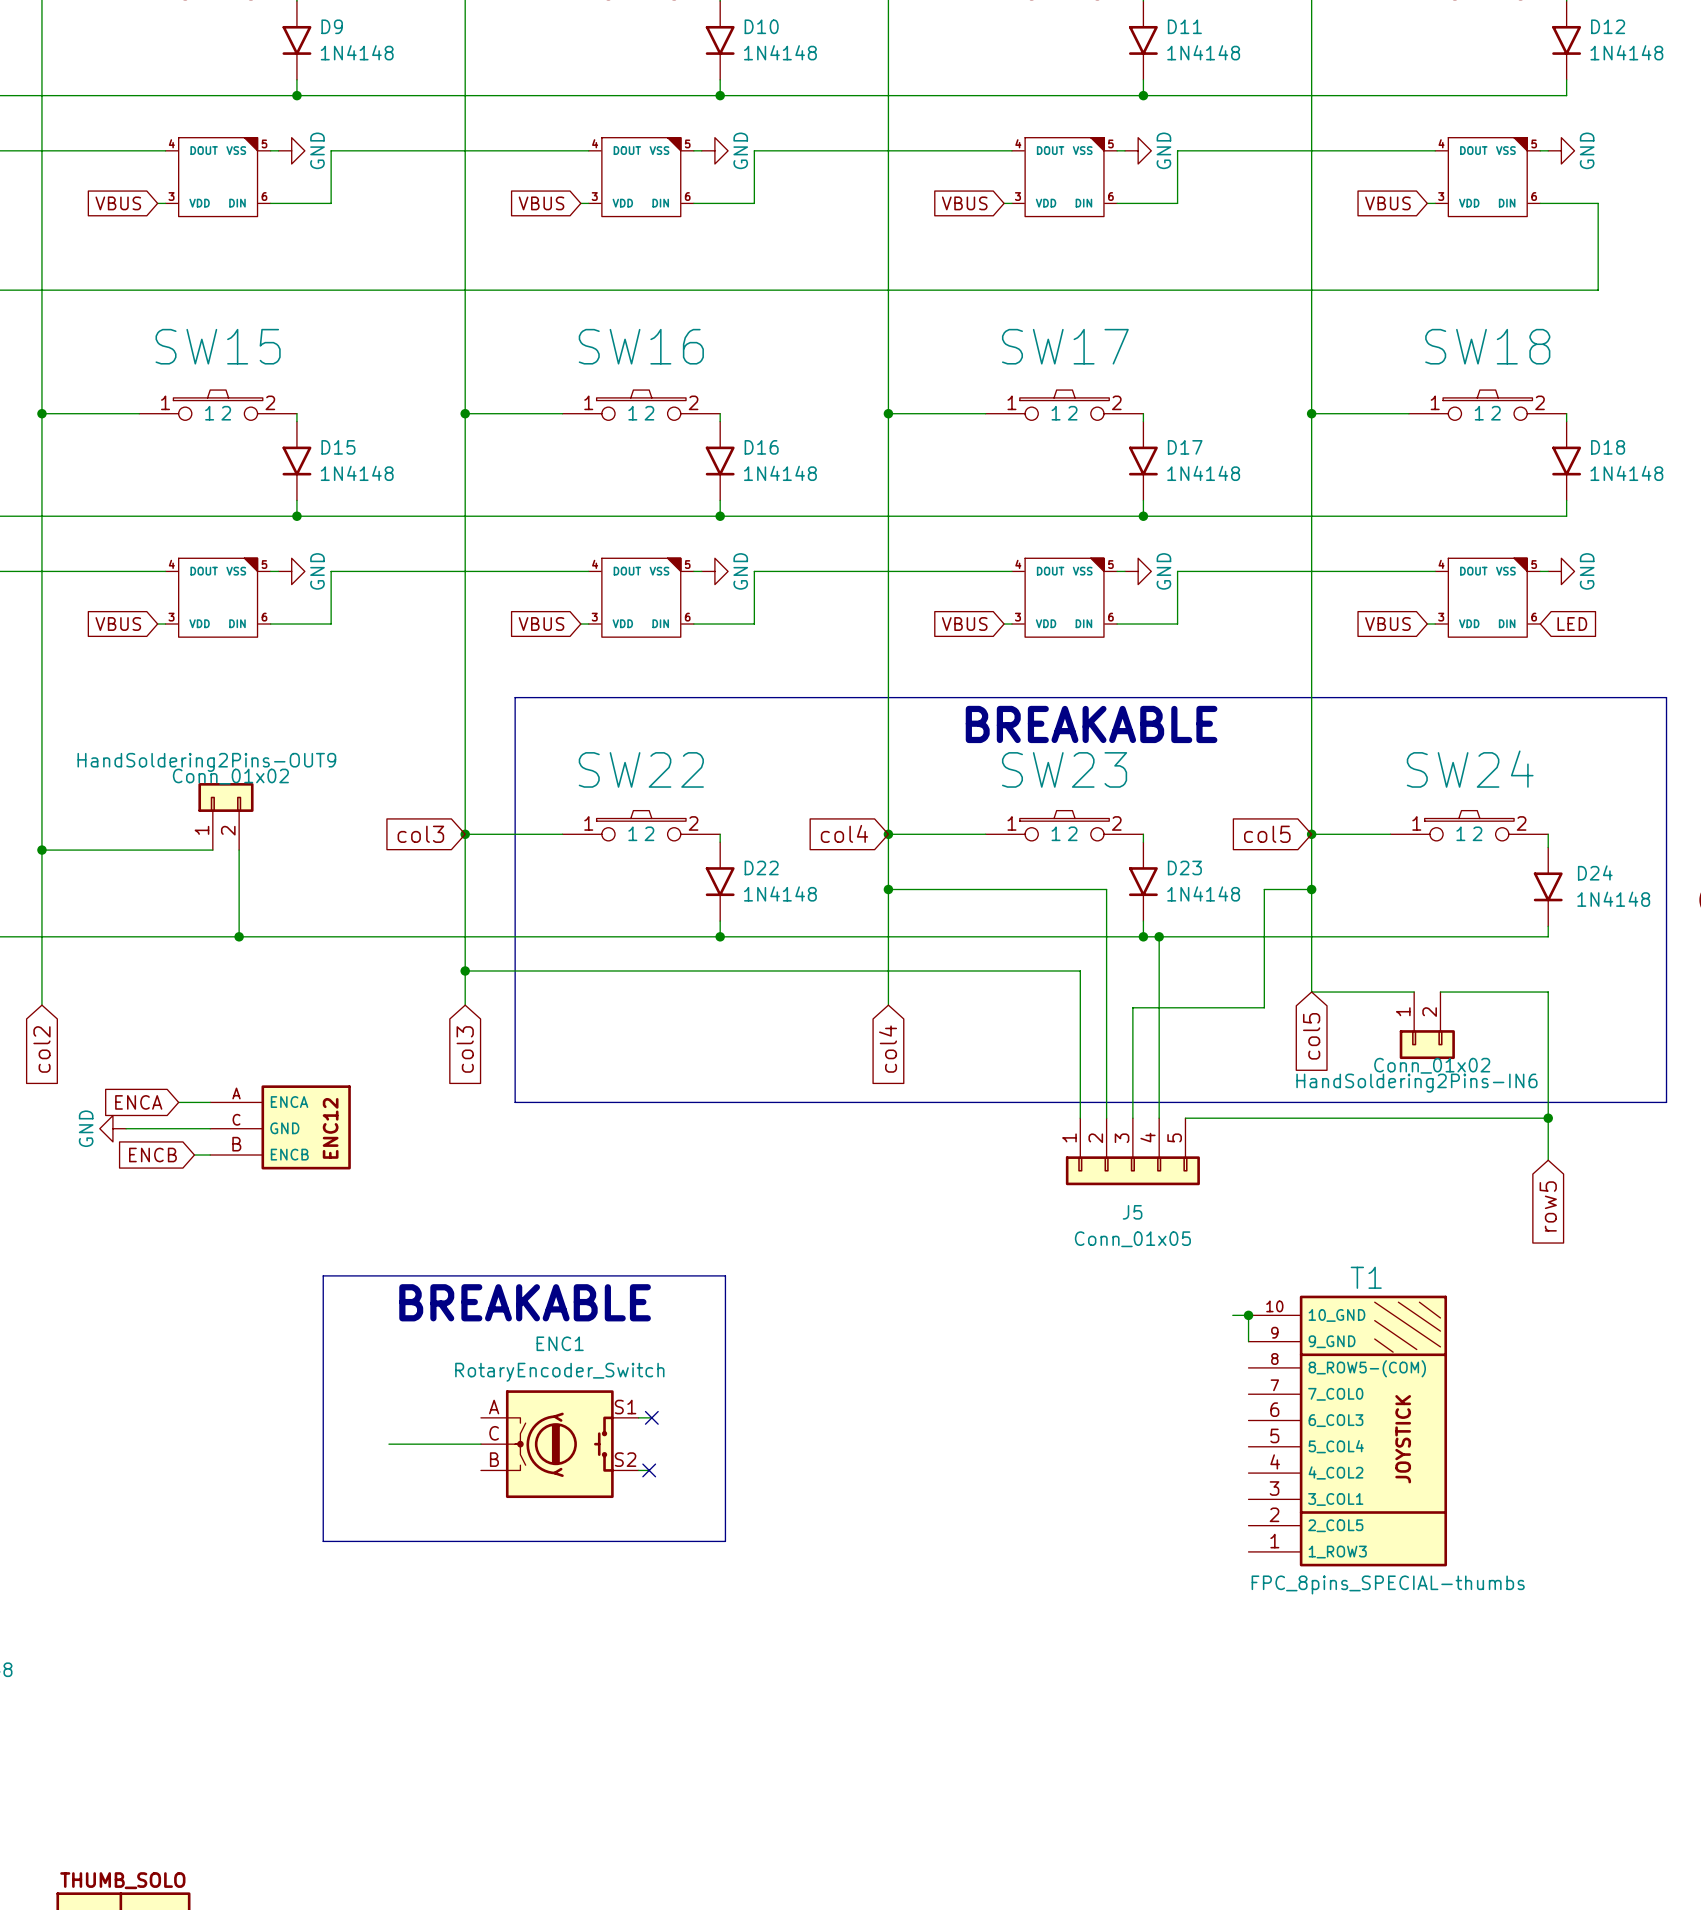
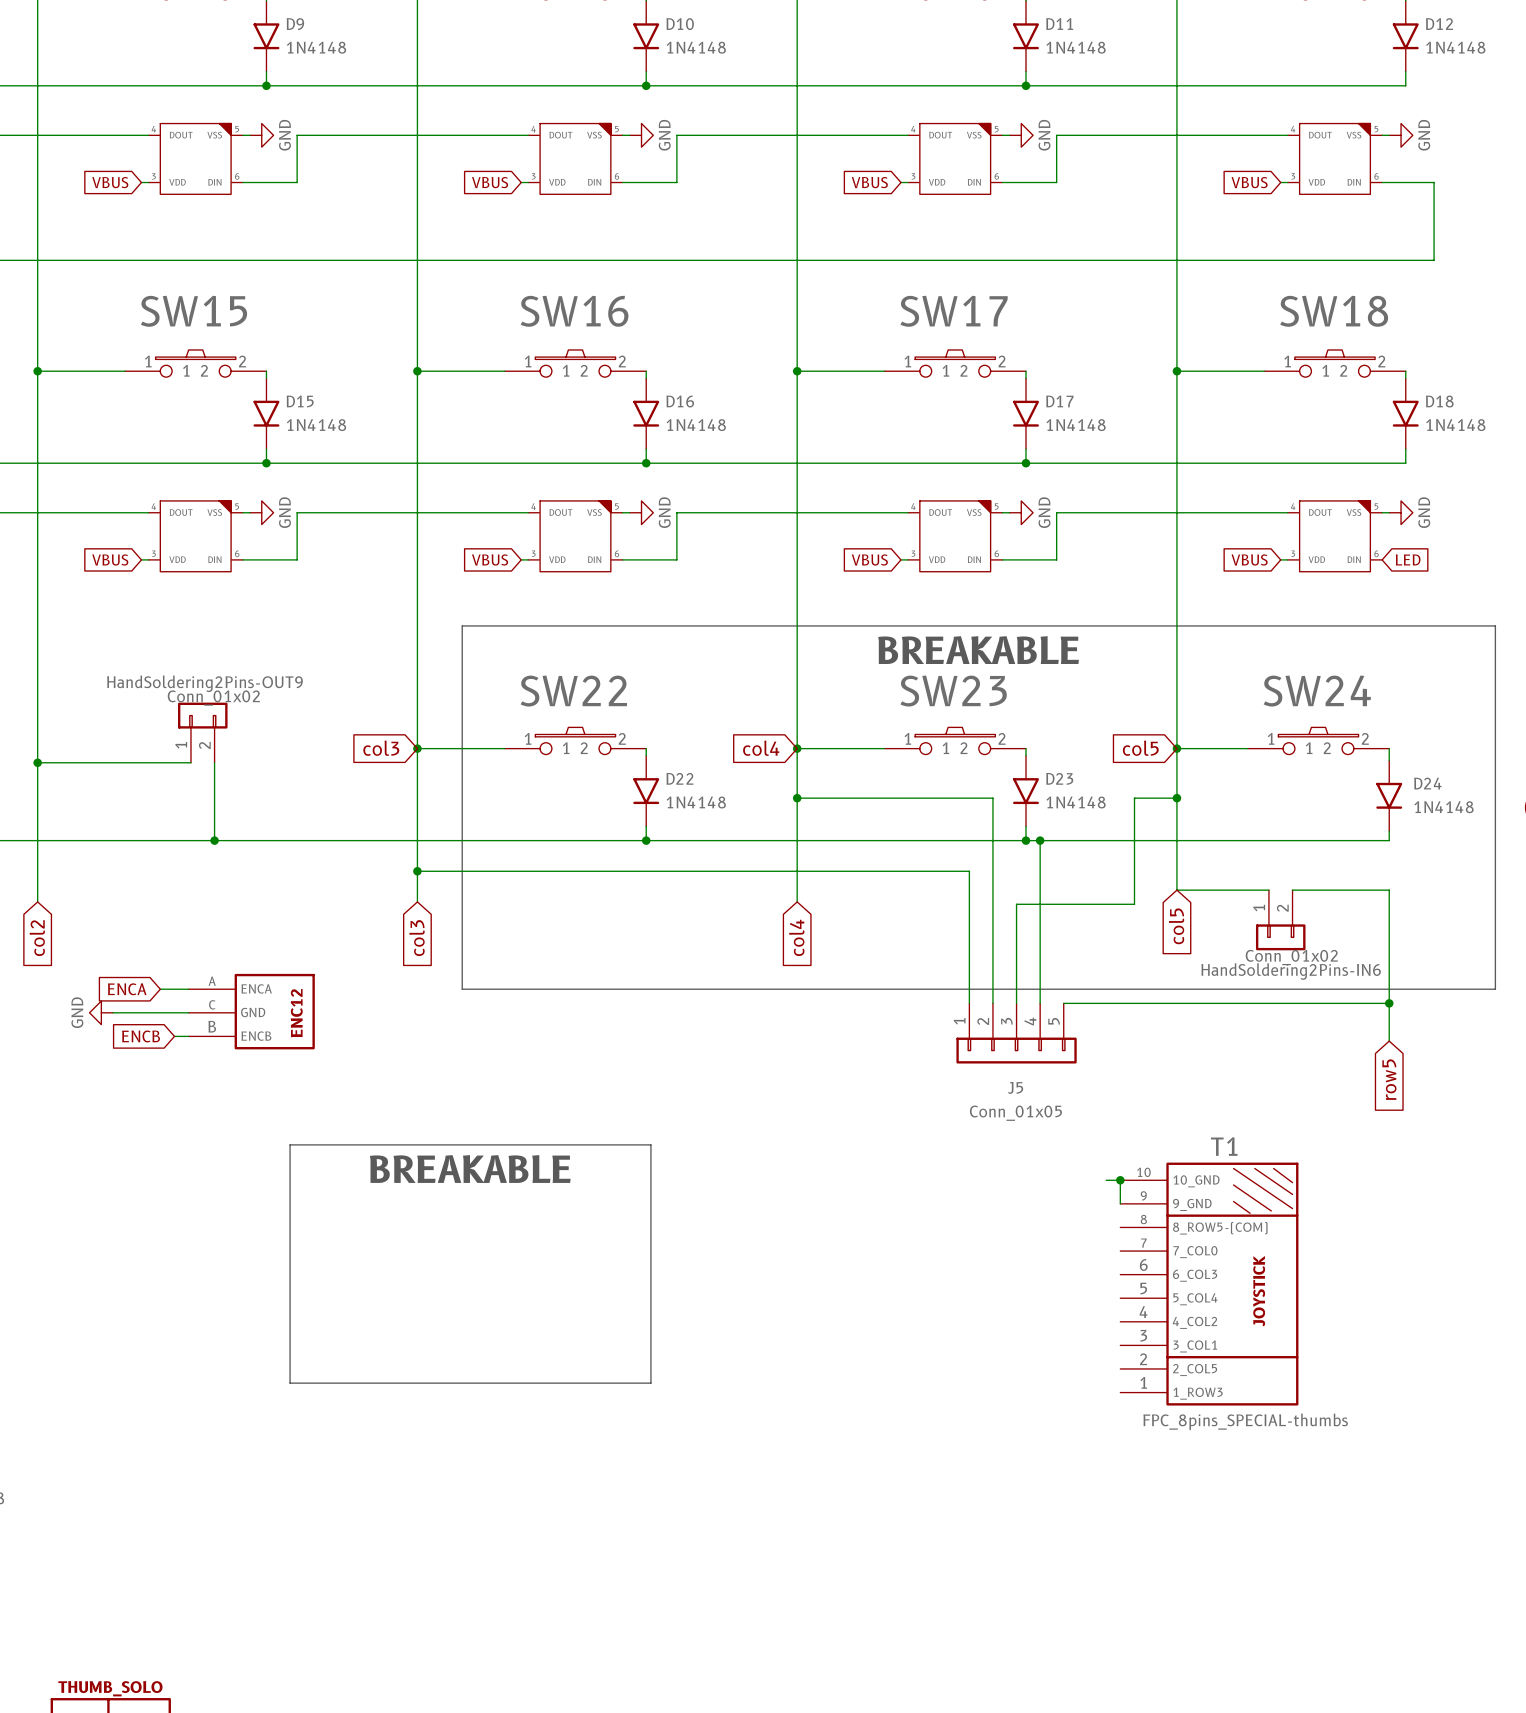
wire: (638, 1417) (651, 1417) -> none
no-connect mark: (651, 1417) -> none
wire: (388, 1444) (480, 1444) -> none
ENC1: RotaryEncoder_Switch (559, 1444) -> none
wire: (638, 1470) (649, 1470) -> none
no-connect mark: (649, 1470) -> none

